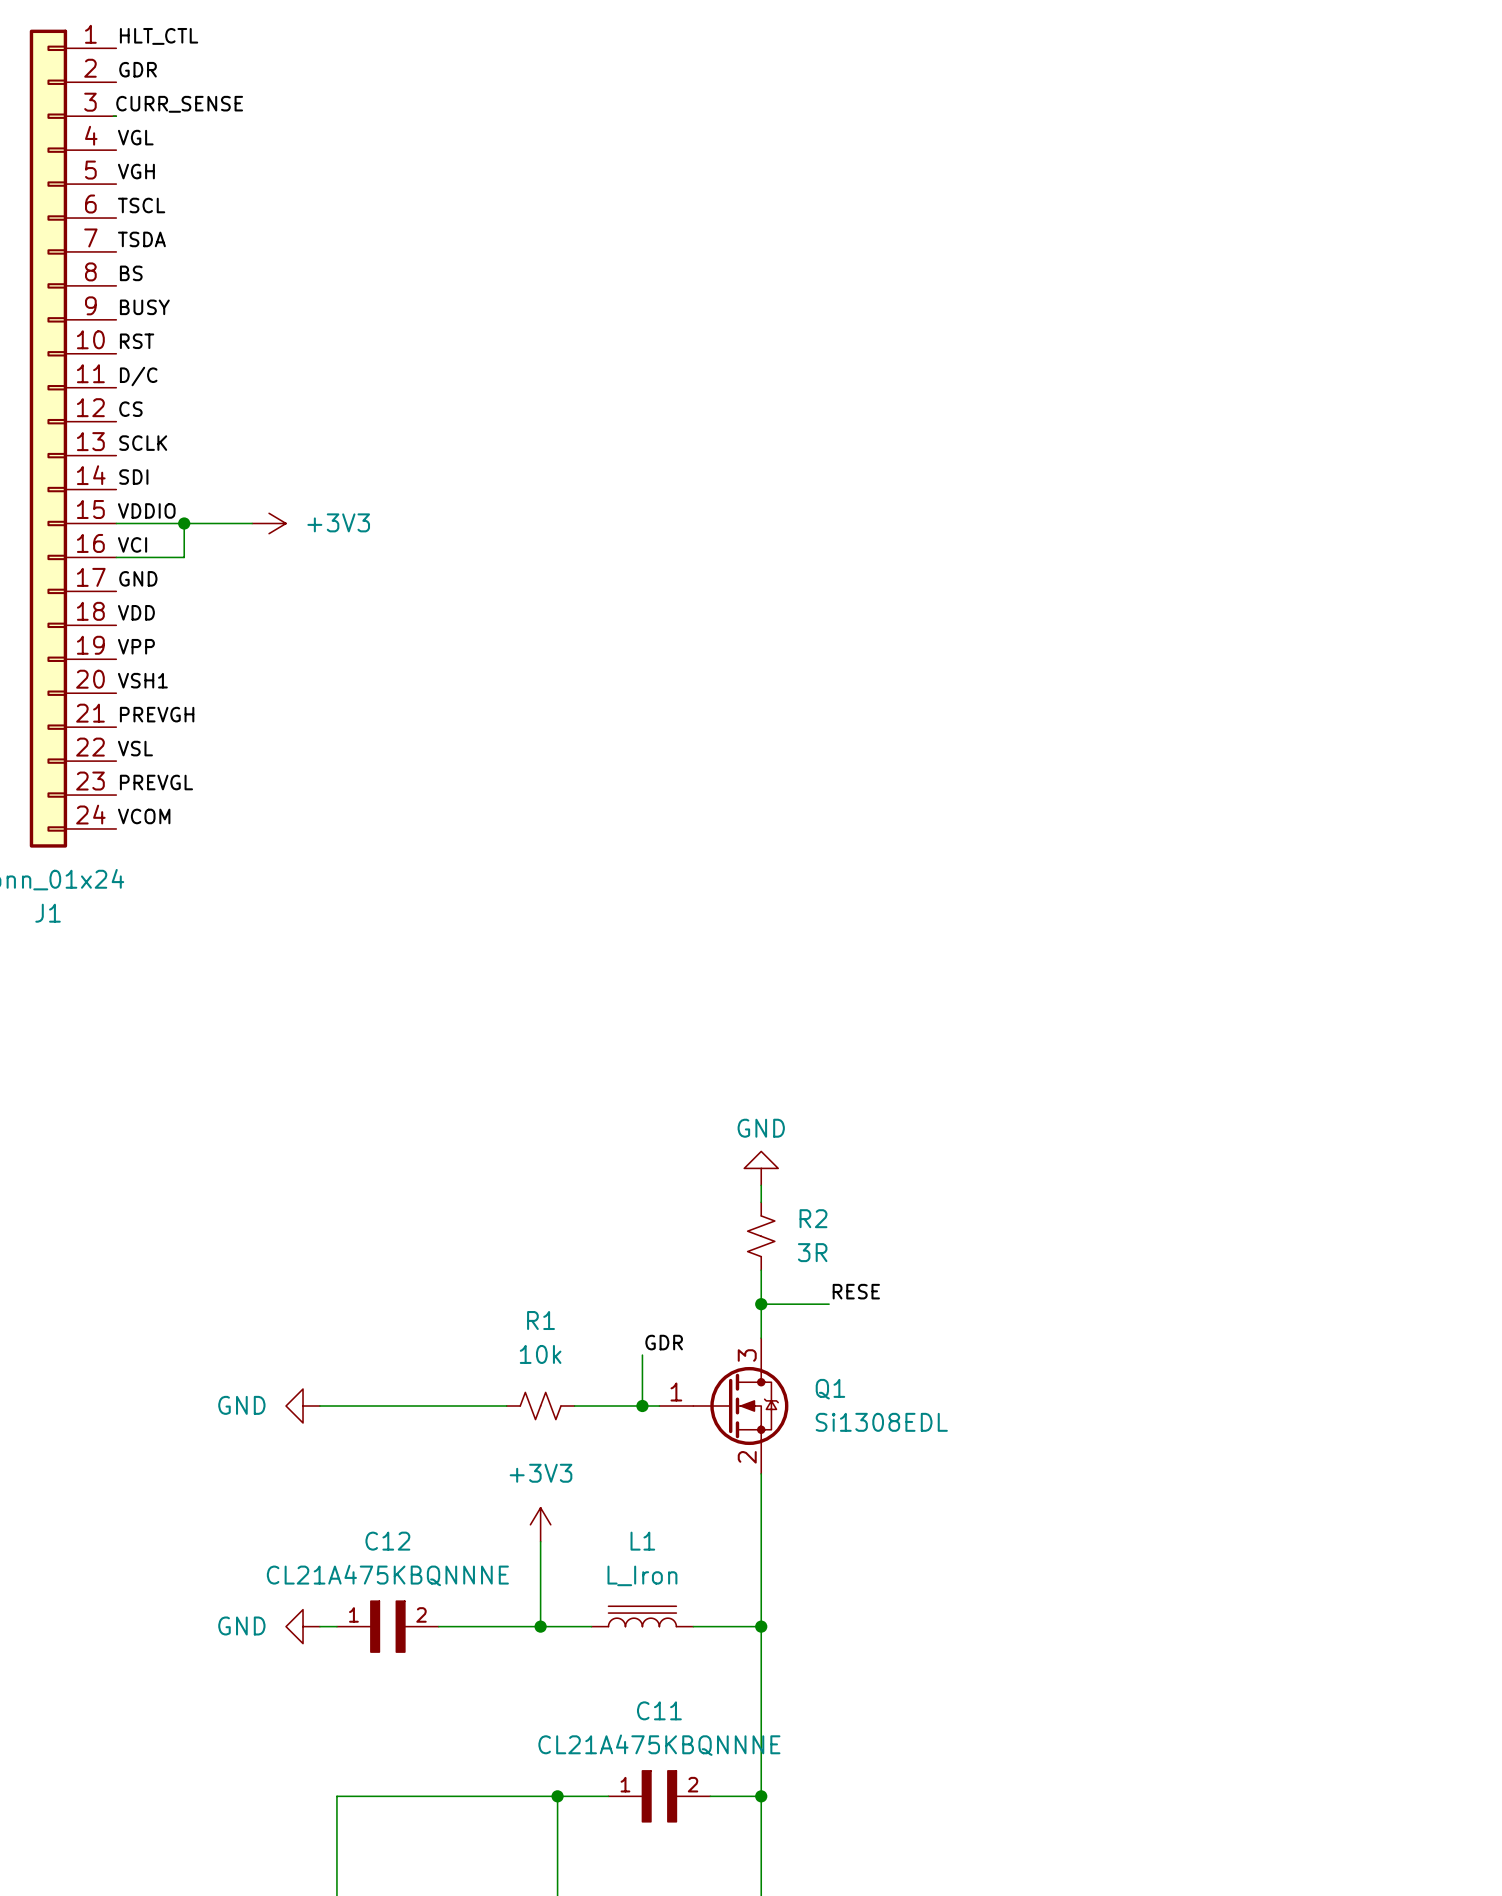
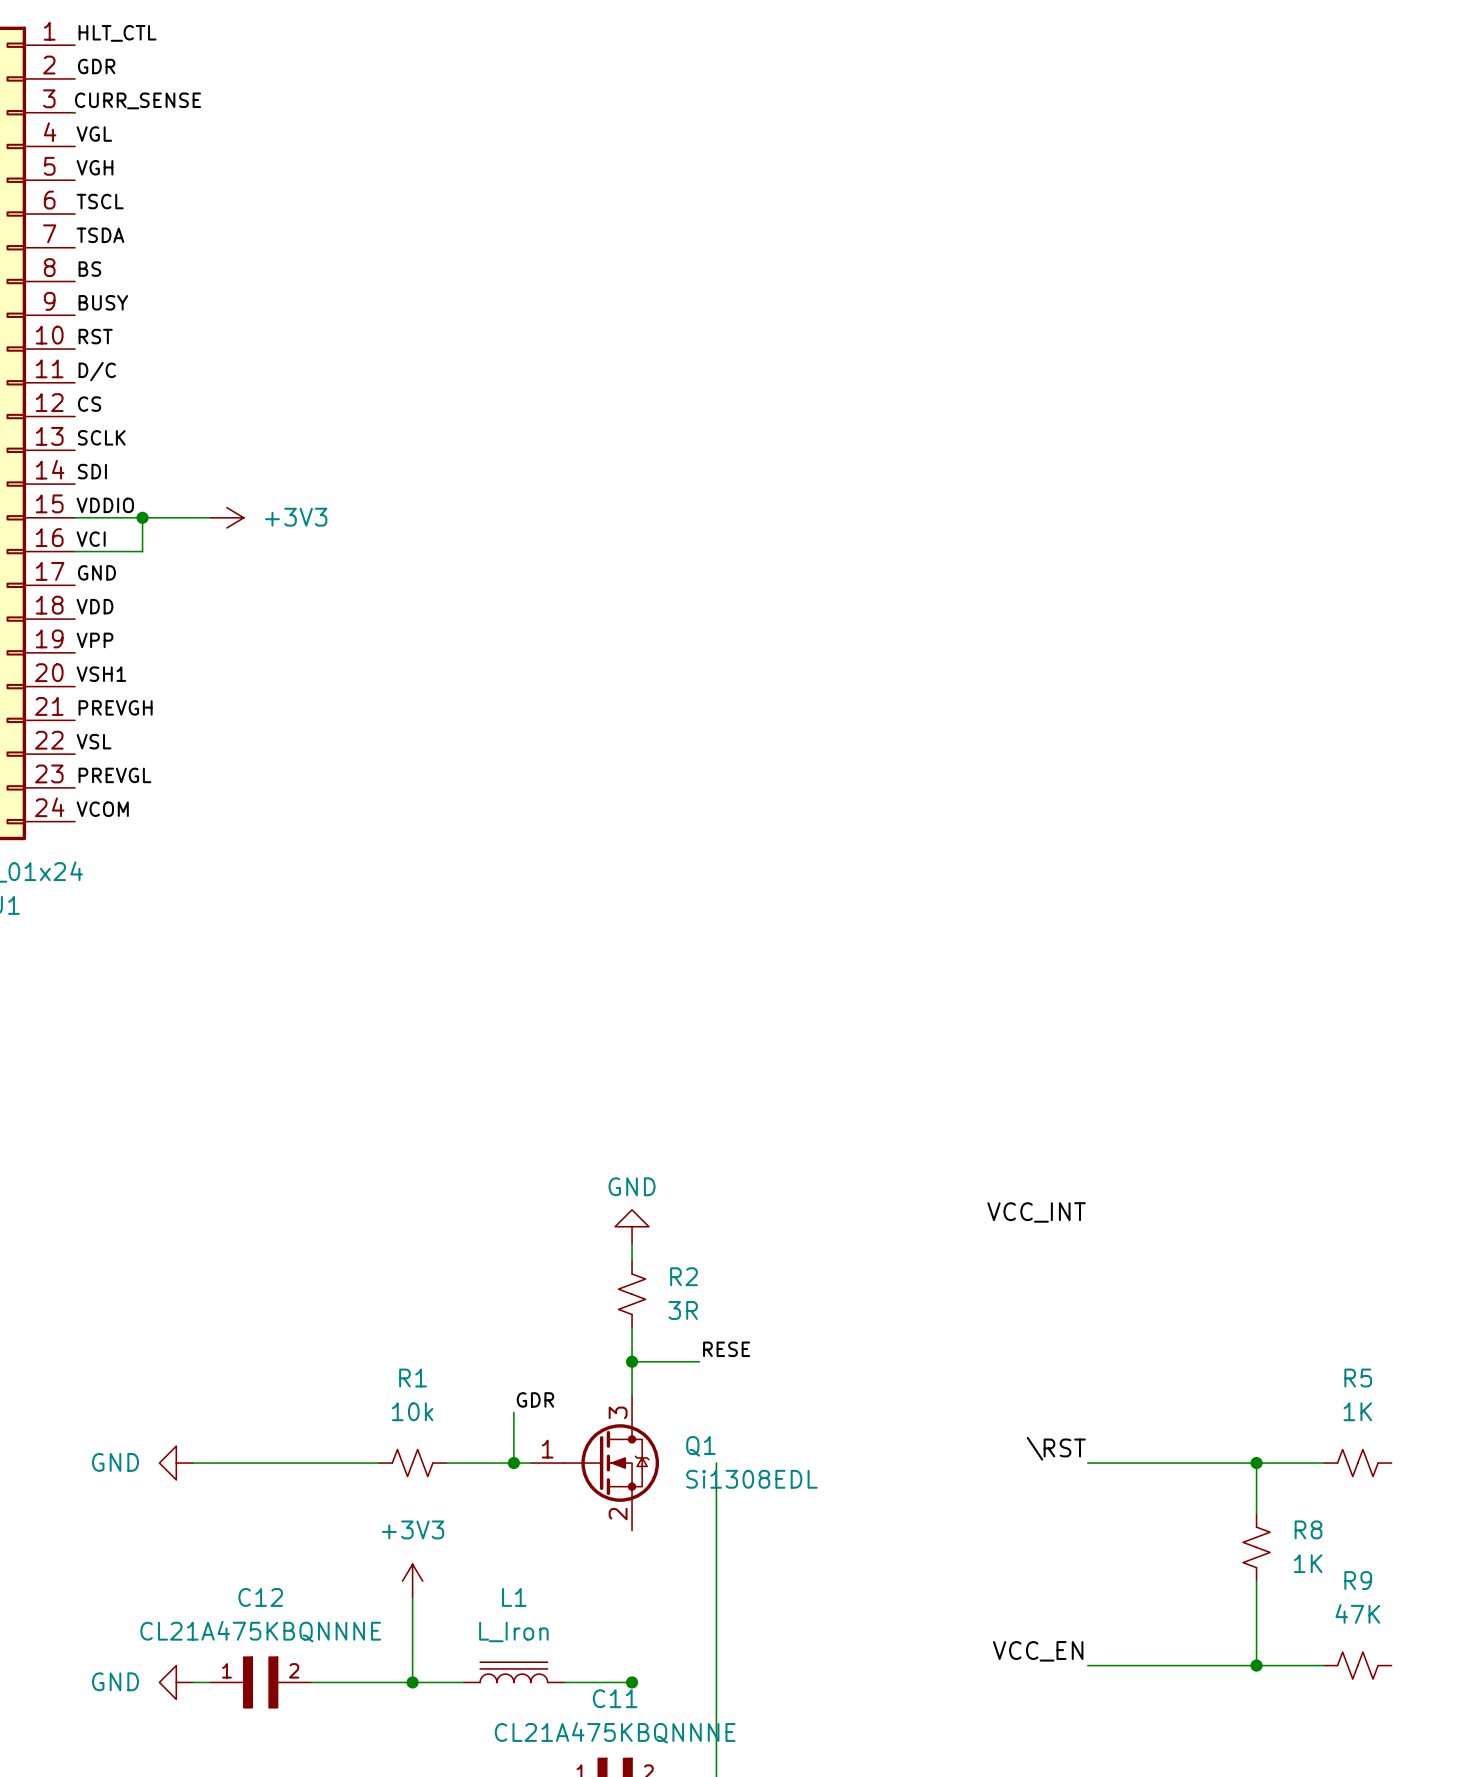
power symbol position: GND (761, 1168) -> GND (632, 1226)
wire: (761, 1185) (761, 1202) -> (632, 1243) (632, 1260)
label: none -> VCC_INT (1036, 1212)
R2 position: (761, 1236) -> (632, 1294)
wire: (761, 1270) (761, 1338) -> (632, 1328) (632, 1395)
label position: RESE (856, 1291) -> RESE (726, 1349)
wire: (761, 1304) (829, 1304) -> (632, 1361) (699, 1361)
junction: (761, 1304) -> none
label position: GDR (664, 1342) -> GDR (535, 1399)
wire: (642, 1355) (642, 1406) -> (513, 1412) (513, 1463)
power symbol: GND (303, 1406) -> none
wire: (319, 1406) (506, 1406) -> (193, 1463) (378, 1463)
R1 position: (540, 1406) -> (412, 1463)
wire: (574, 1406) (659, 1406) -> (446, 1463) (530, 1463)
junction position: (642, 1406) -> (632, 1361)
Q1 position: (723, 1406) -> (594, 1463)
label: none -> \RST (1056, 1448)
power symbol: none -> GND (176, 1463)
junction: none -> (513, 1463)
wire: none -> (1087, 1463) (1324, 1463)
wire: none -> (1256, 1463) (1256, 1513)
junction: none -> (1256, 1463)
R5: none -> 1K (1357, 1463)
power symbol position: +3V3 (540, 1524) -> +3V3 (412, 1581)
wire: (540, 1541) (540, 1626) -> (412, 1598) (412, 1682)
R8: none -> 1K (1256, 1547)
wire: none -> (1256, 1581) (1256, 1665)
L1 position: (642, 1616) -> (513, 1672)
power symbol: GND (303, 1626) -> none
wire: (319, 1626) (336, 1626) -> (193, 1682) (210, 1682)
C12 position: (387, 1626) -> (260, 1682)
wire: (438, 1626) (591, 1626) -> (311, 1682) (463, 1682)
junction: (540, 1626) -> none
wire: (693, 1626) (761, 1626) -> (564, 1682) (632, 1682)
junction: (761, 1626) -> none
label: none -> VCC_EN (1038, 1651)
wire: none -> (1087, 1665) (1324, 1665)
junction: none -> (1256, 1665)
R9: none -> 47K (1357, 1665)
power symbol: none -> GND (176, 1682)
junction: none -> (412, 1682)
junction: none -> (632, 1682)

